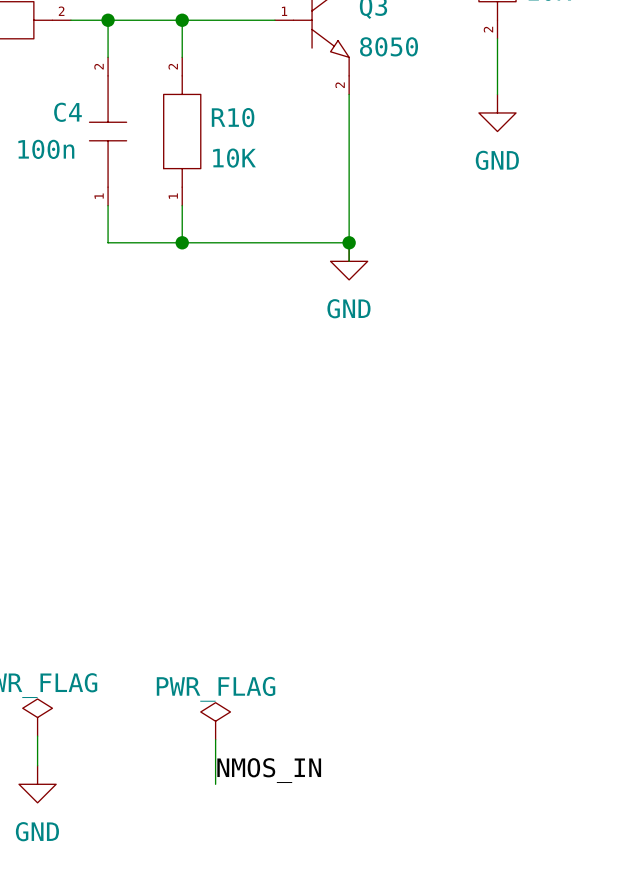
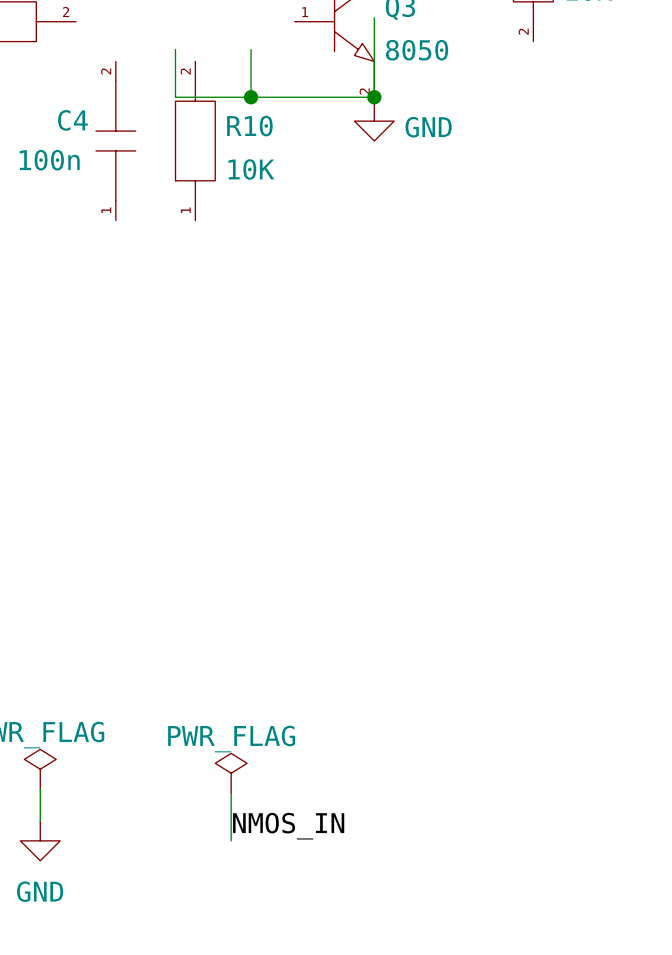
wire: (70, 20) (274, 20) -> none
wire: (108, 20) (108, 57) -> none
junction: (108, 20) -> none
wire: (182, 20) (182, 57) -> none
junction: (182, 20) -> none
wire: (497, 38) (497, 94) -> none
wire: none -> (175, 49) (175, 97) (374, 97)
wire: none -> (251, 49) (251, 97)
junction: none -> (251, 97)
junction: none -> (374, 97)
wire: (349, 94) (349, 261) -> (374, 101) (374, 17)
power symbol: none -> GND (374, 121)
power symbol: GND (497, 112) -> none
wire: (108, 205) (108, 242) (349, 242) -> none
wire: (182, 205) (182, 242) -> none
junction: (182, 242) -> none
junction: (349, 242) -> none
power symbol: GND (349, 261) -> none

